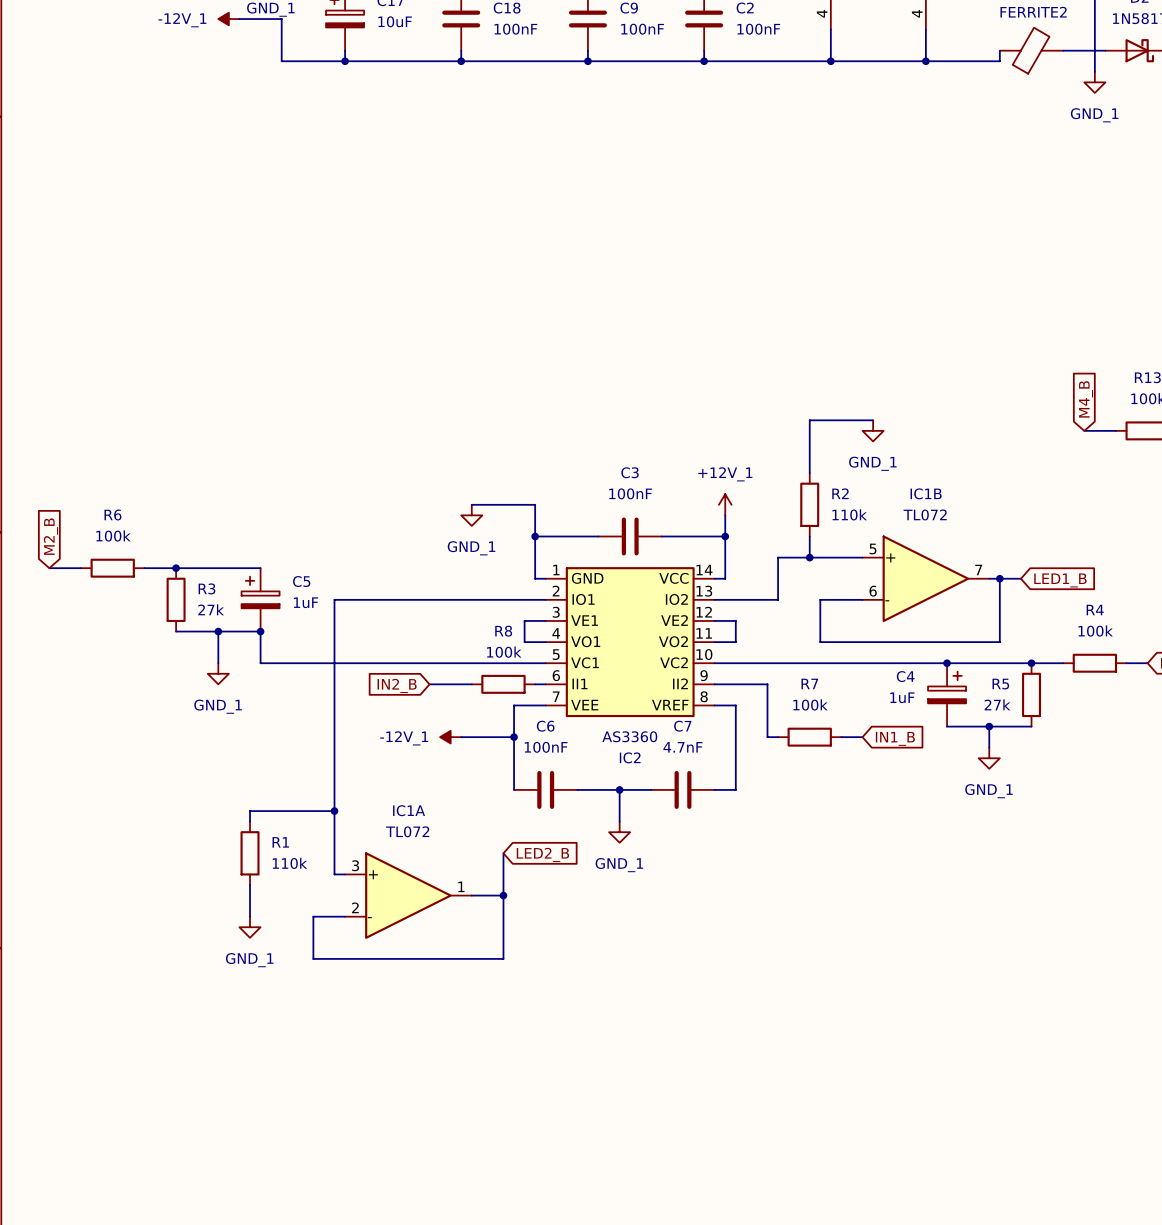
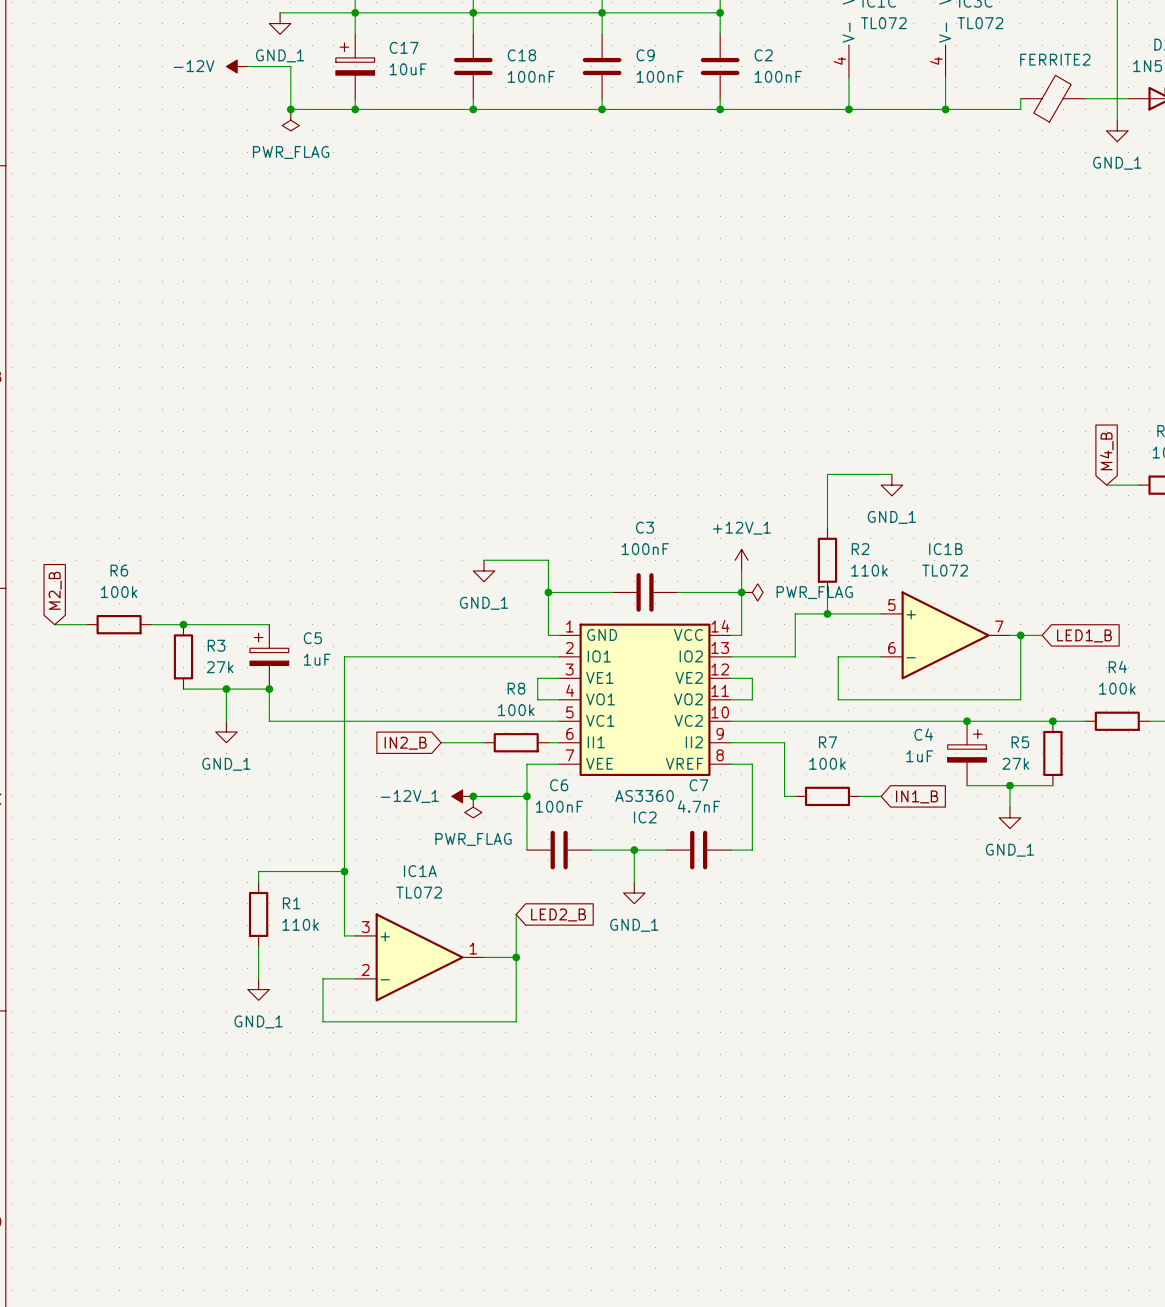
power symbol: -12V_1 (228, 19) -> -12V (237, 66)
junction: none -> (290, 109)
power symbol: none -> PWR_FLAG (290, 120)
power symbol: none -> PWR_FLAG (752, 592)
junction: none -> (473, 796)
power symbol: none -> PWR_FLAG (473, 807)

